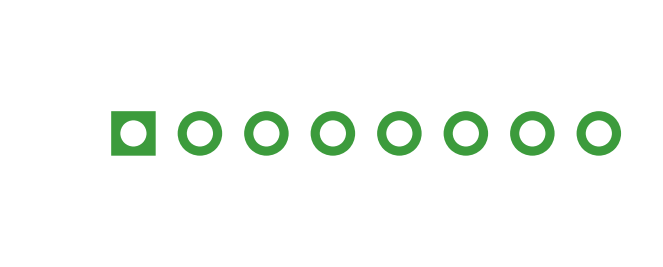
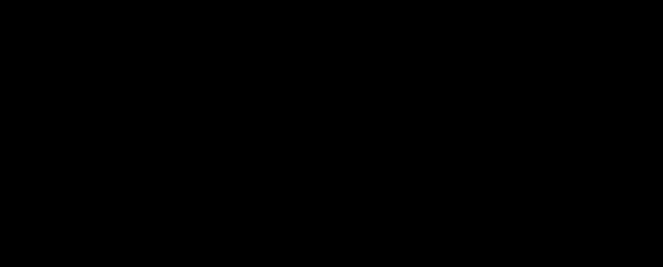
part: (366, 133) -> none

